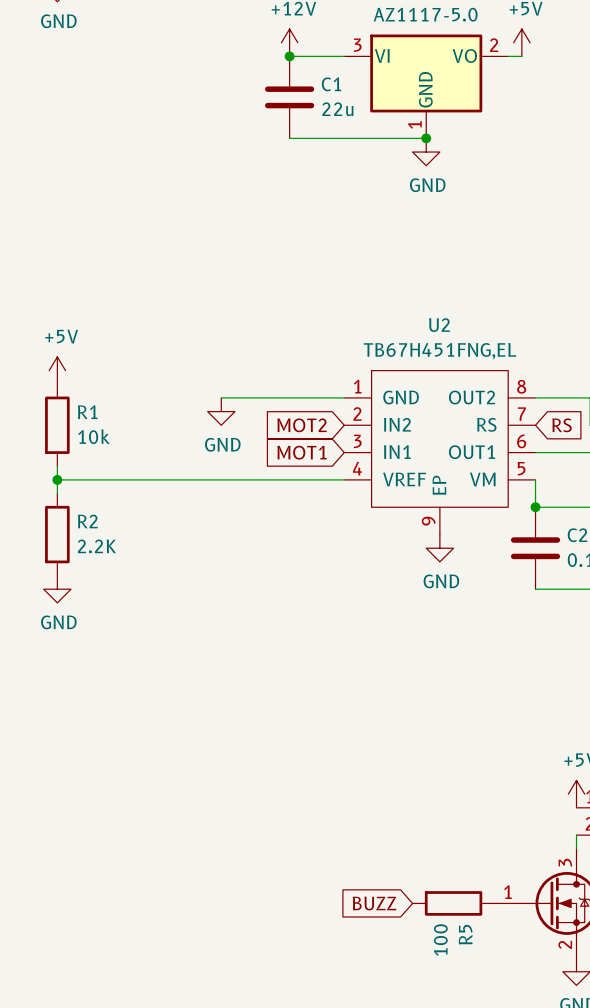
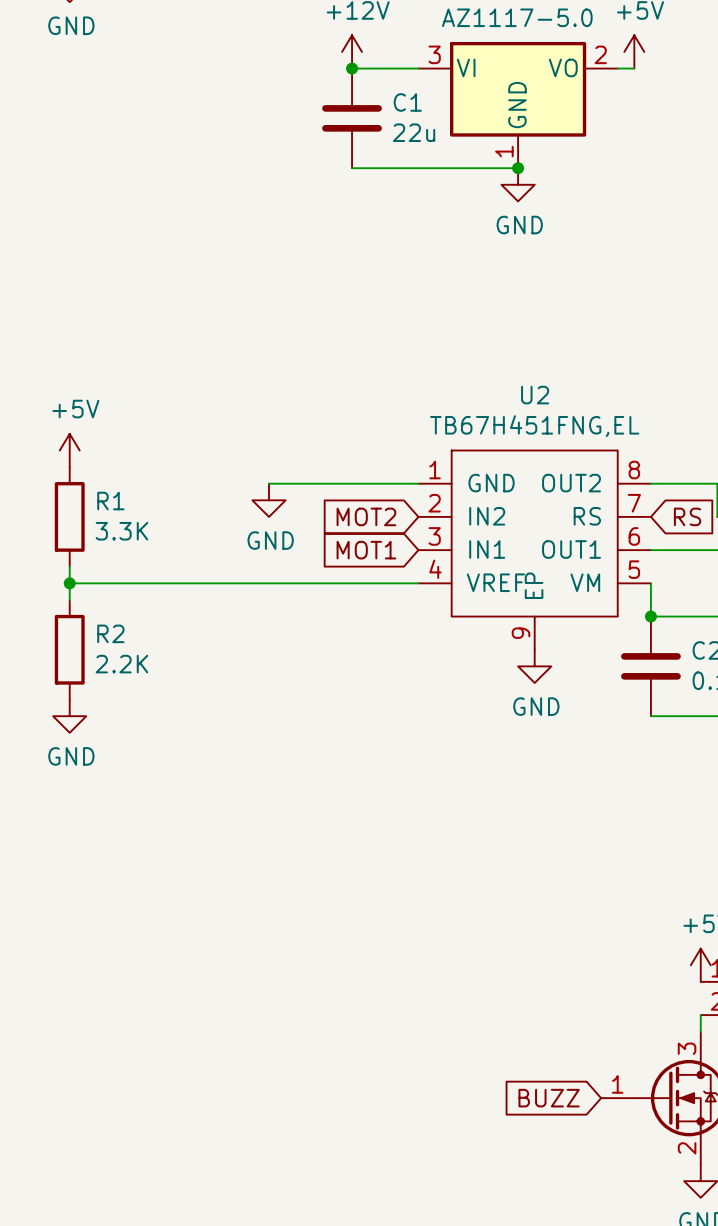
R1 value: 10k (94, 436) -> 3.3K (121, 531)
global label position: BUZZ (374, 903) -> BUZZ (549, 1098)
R5: 100 (453, 903) -> none

